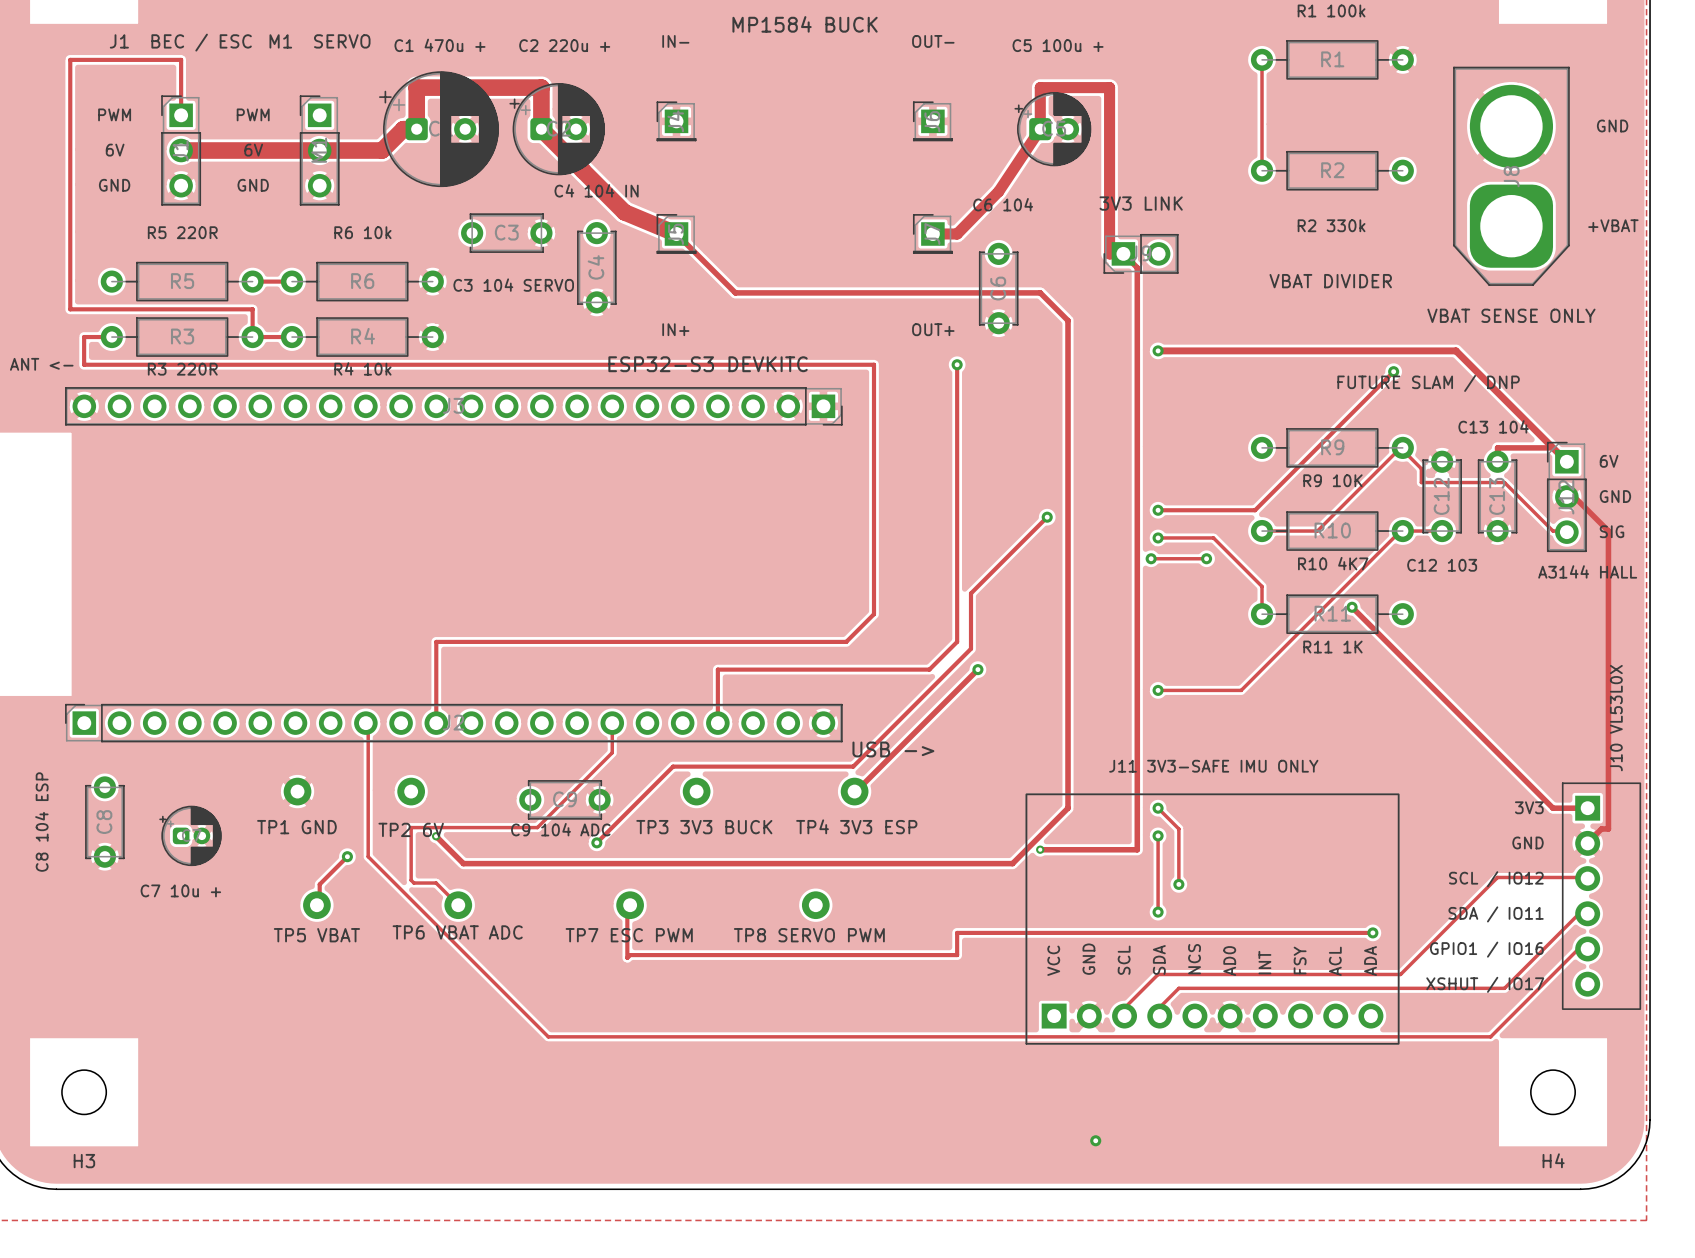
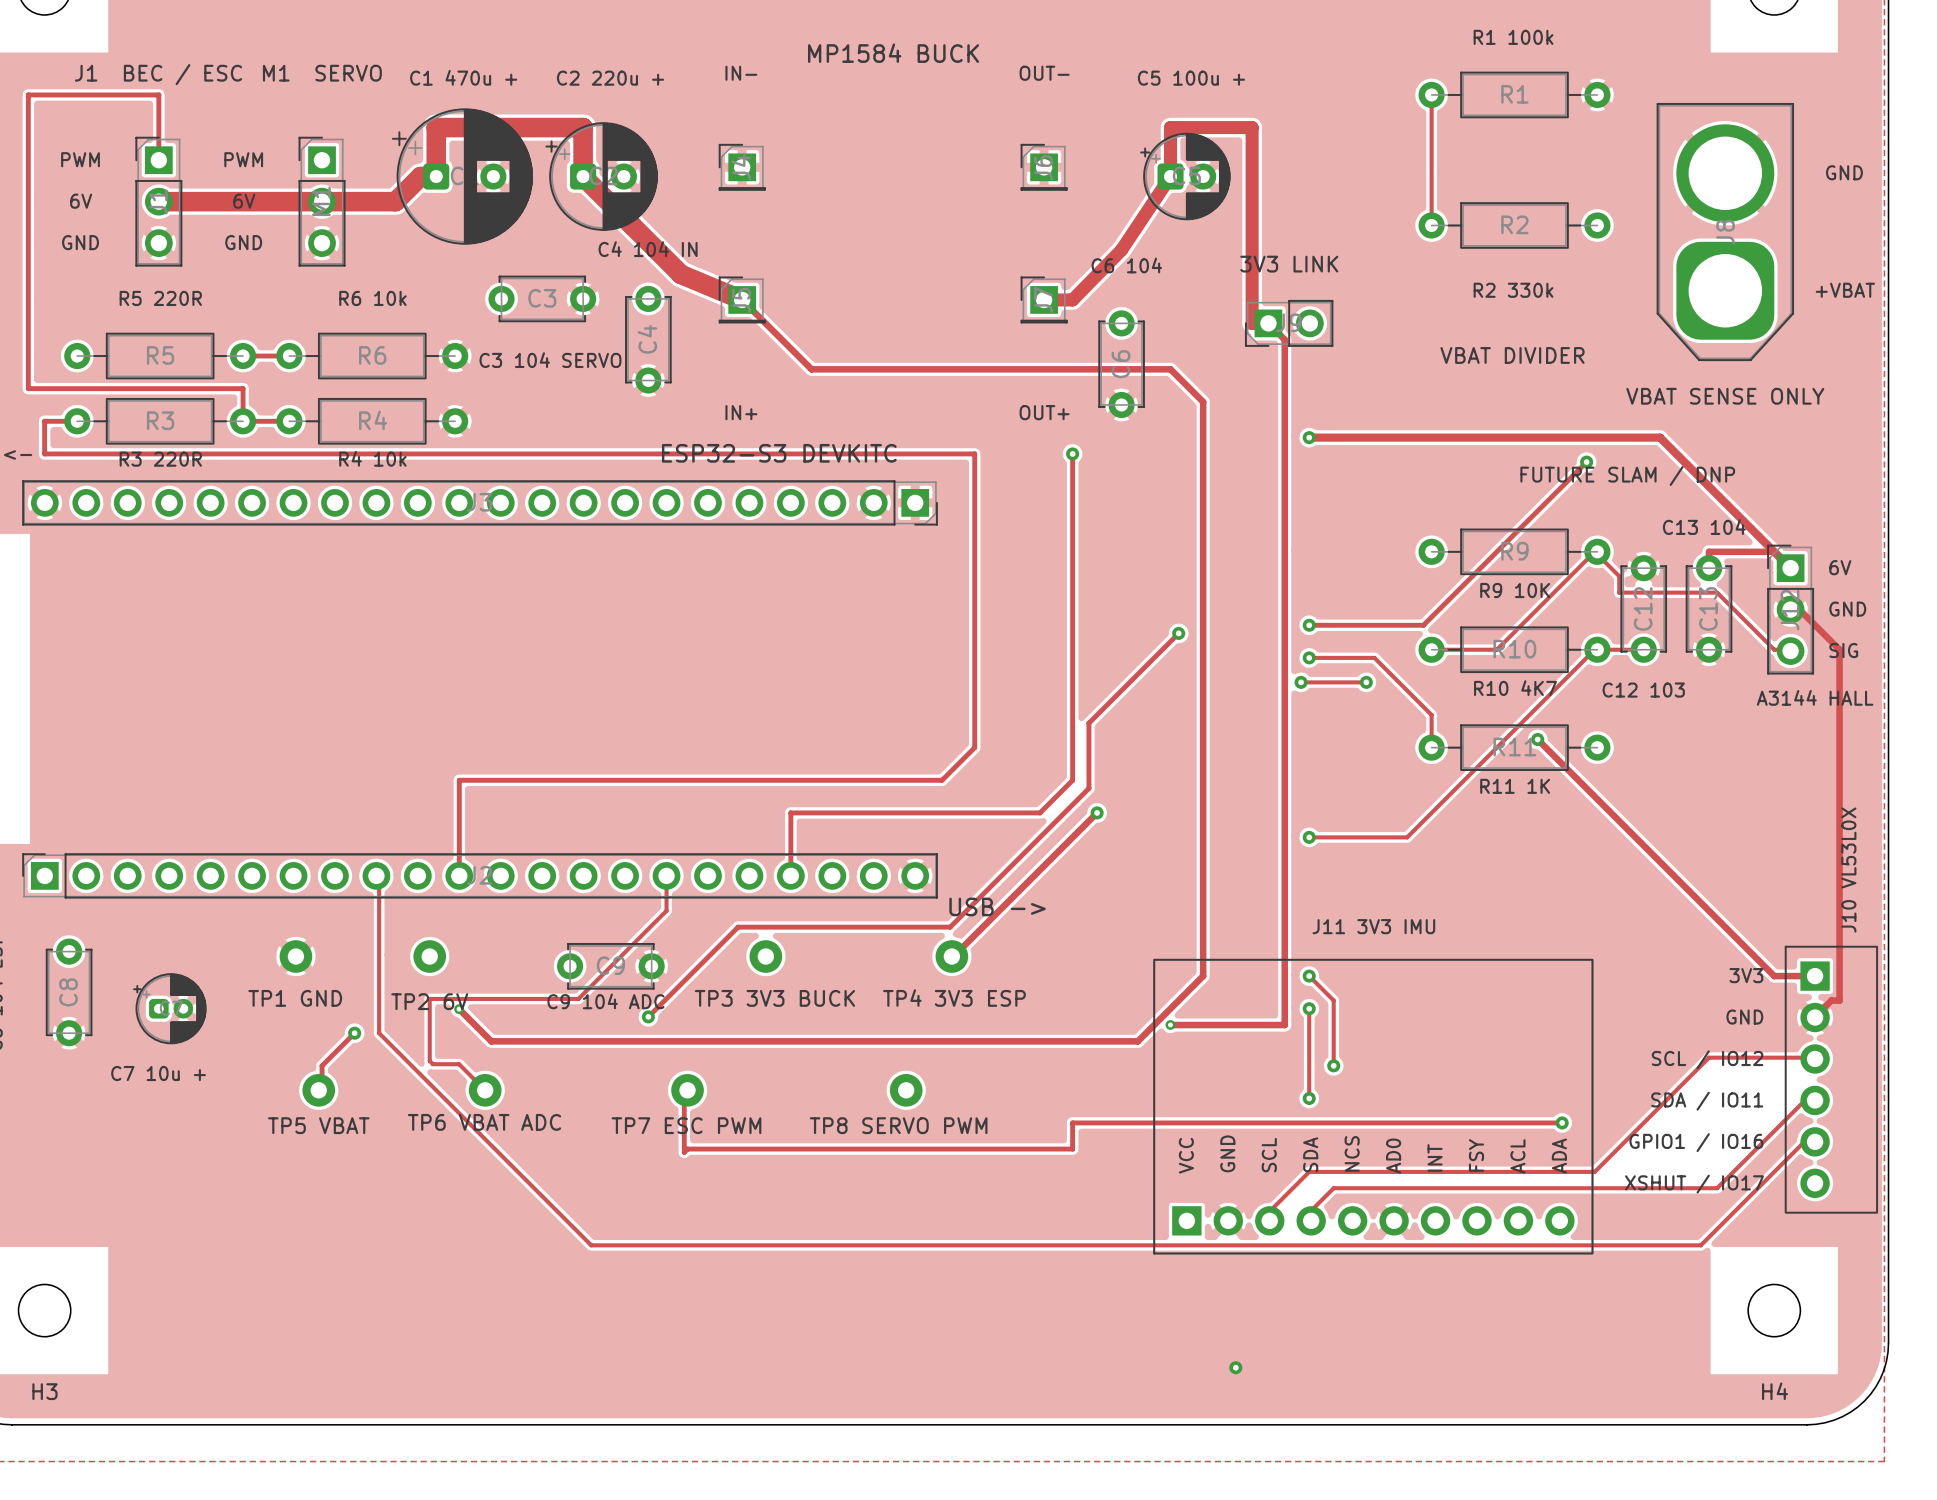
text: J11 3V3-SAFE IMU ONLY (1213, 766) -> J11 3V3 IMU (1373, 926)

